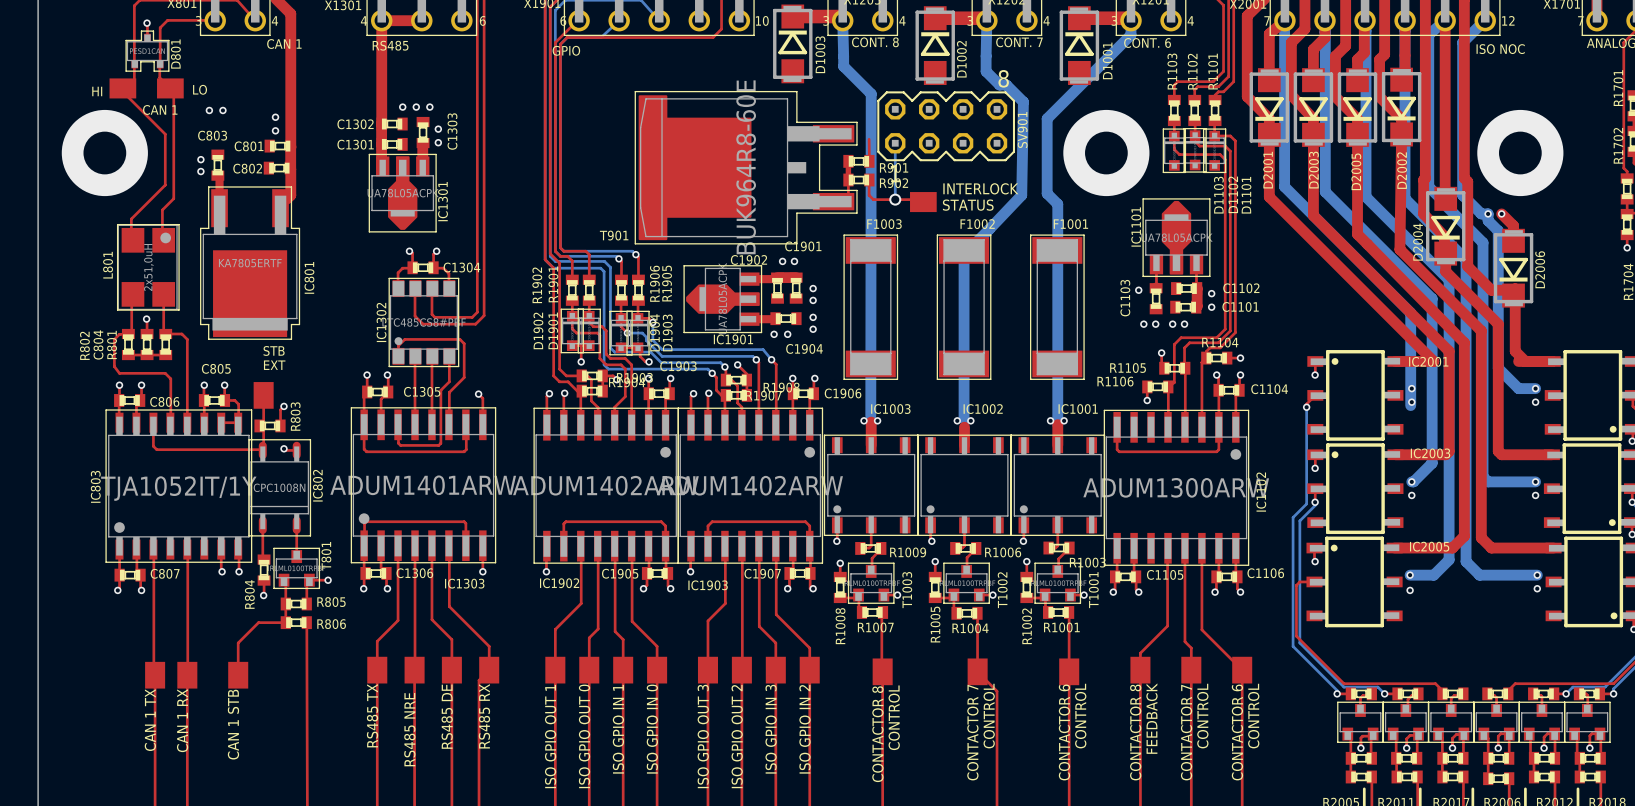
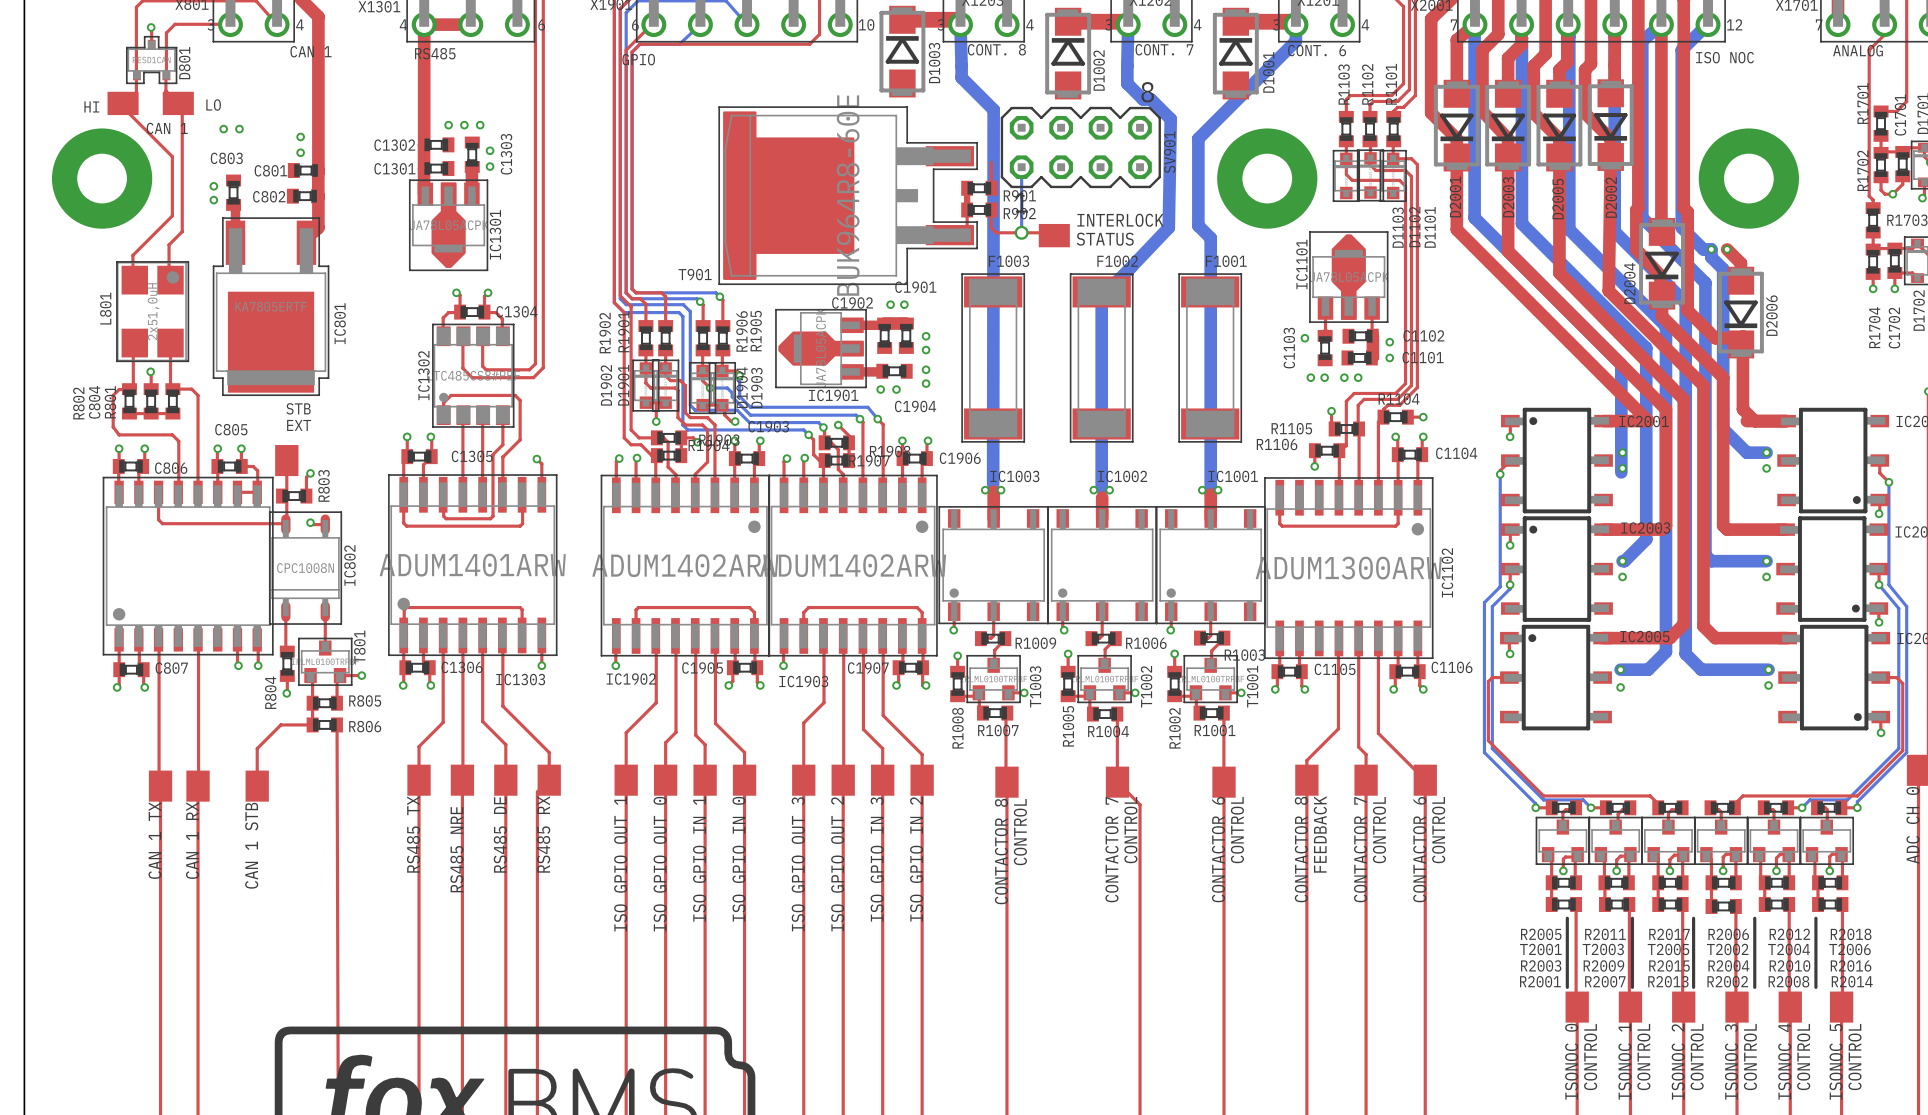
IC803 name: IC803 (95, 486) -> none
IC803 text: TJA1052IT/1Y (178, 488) -> none

